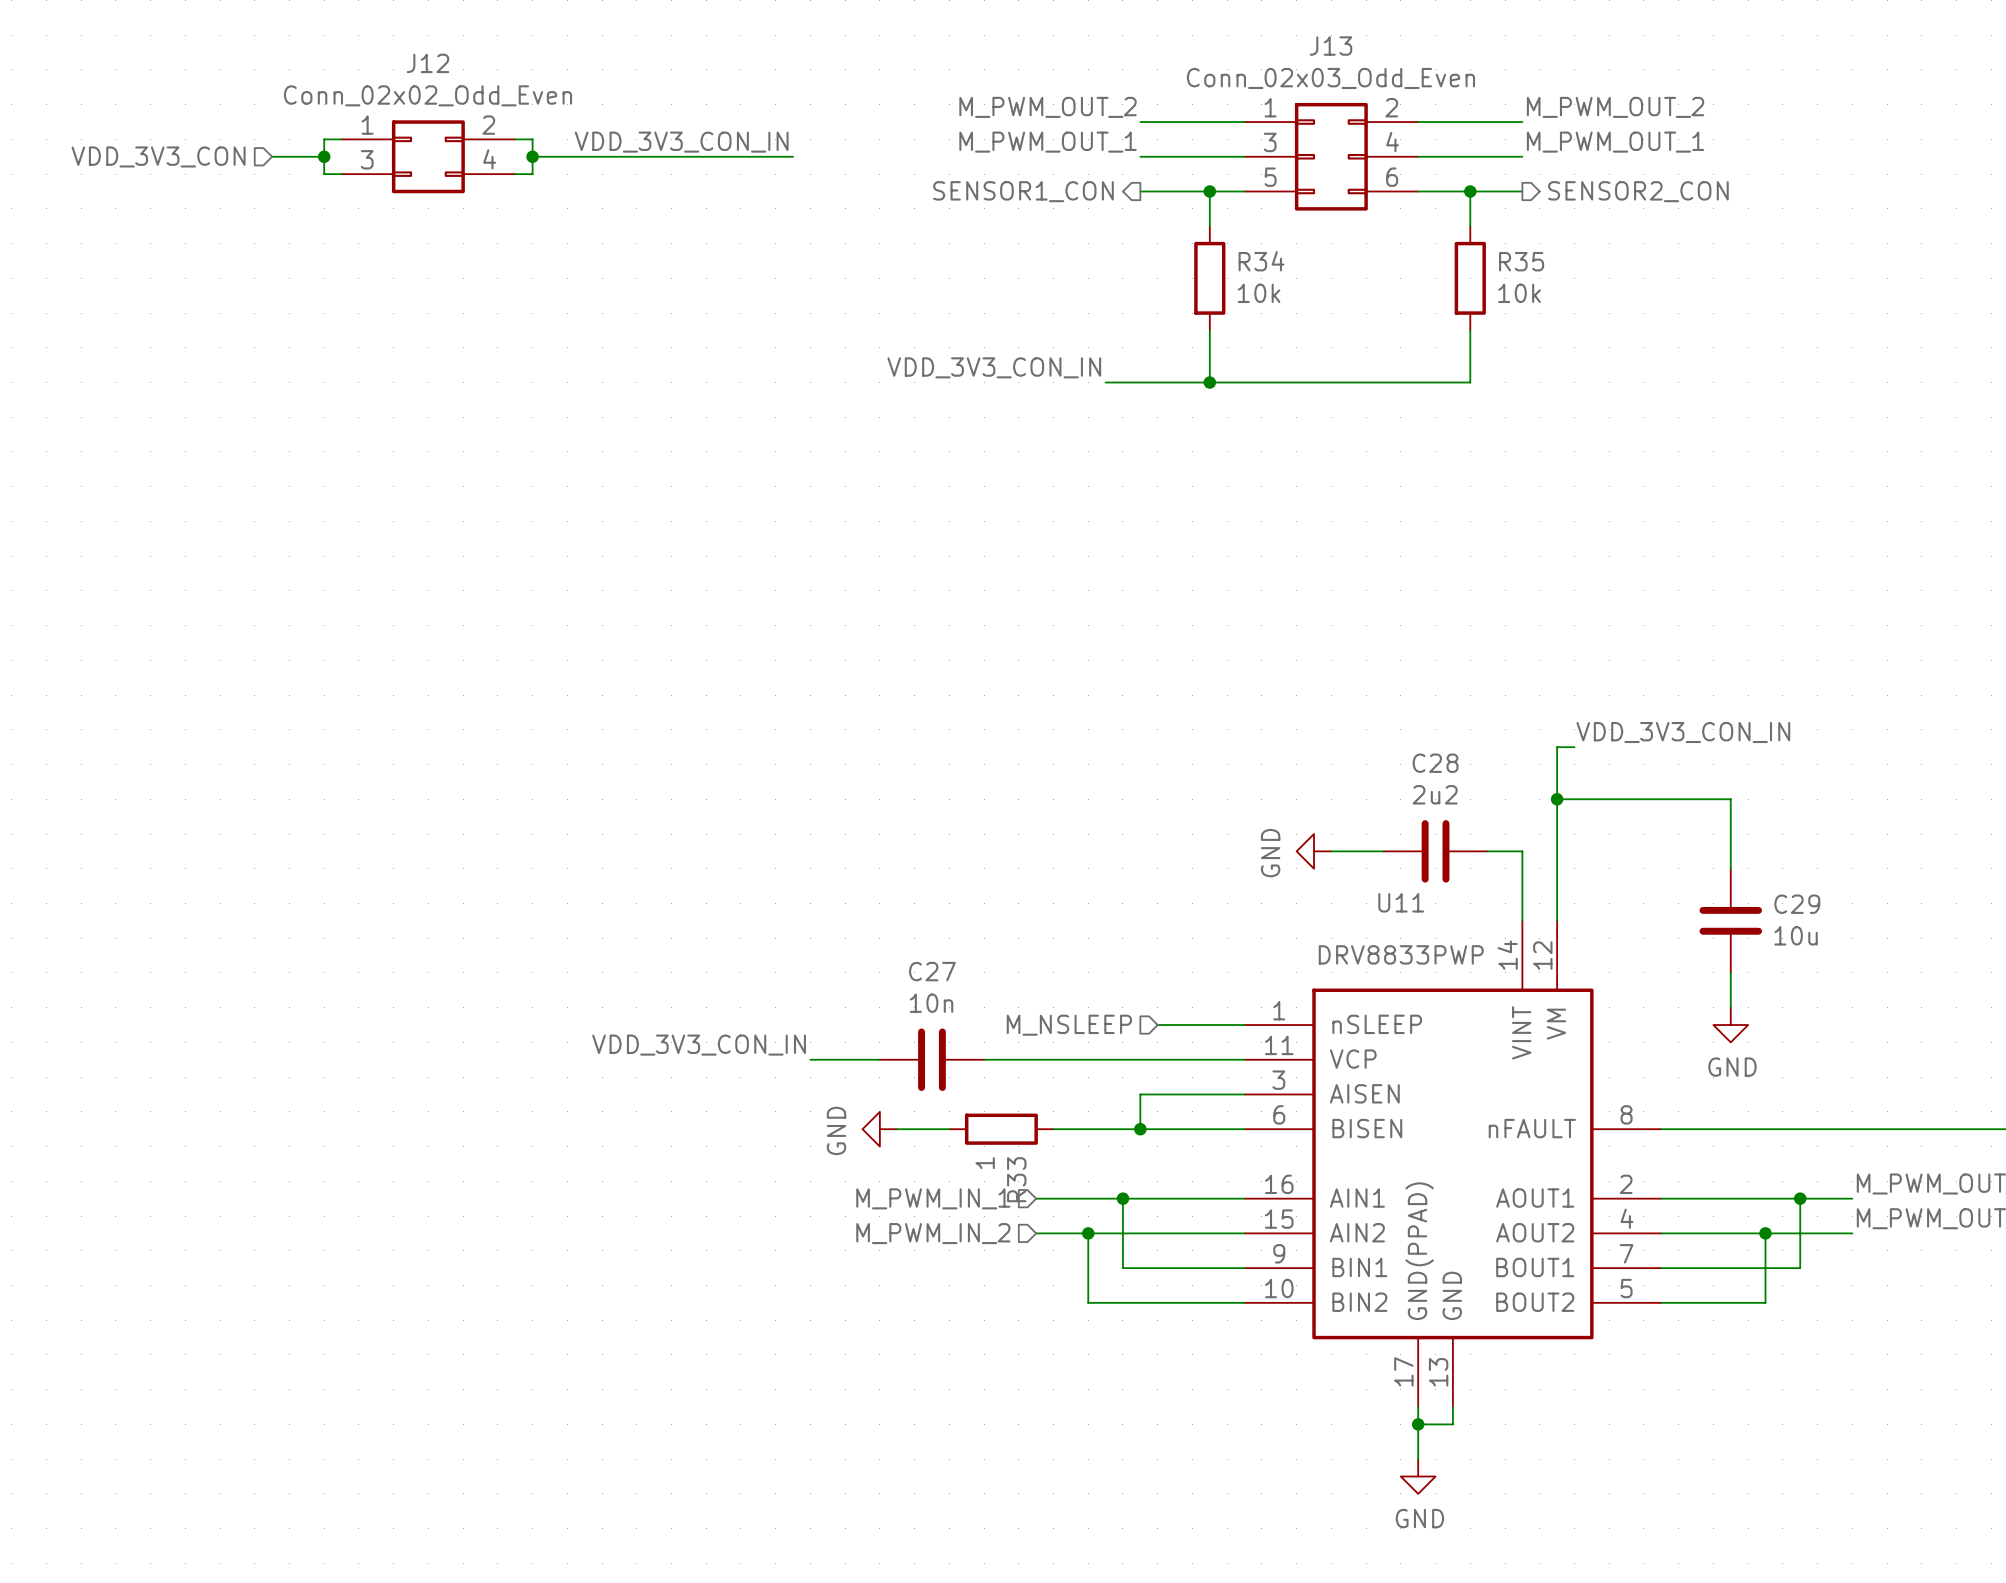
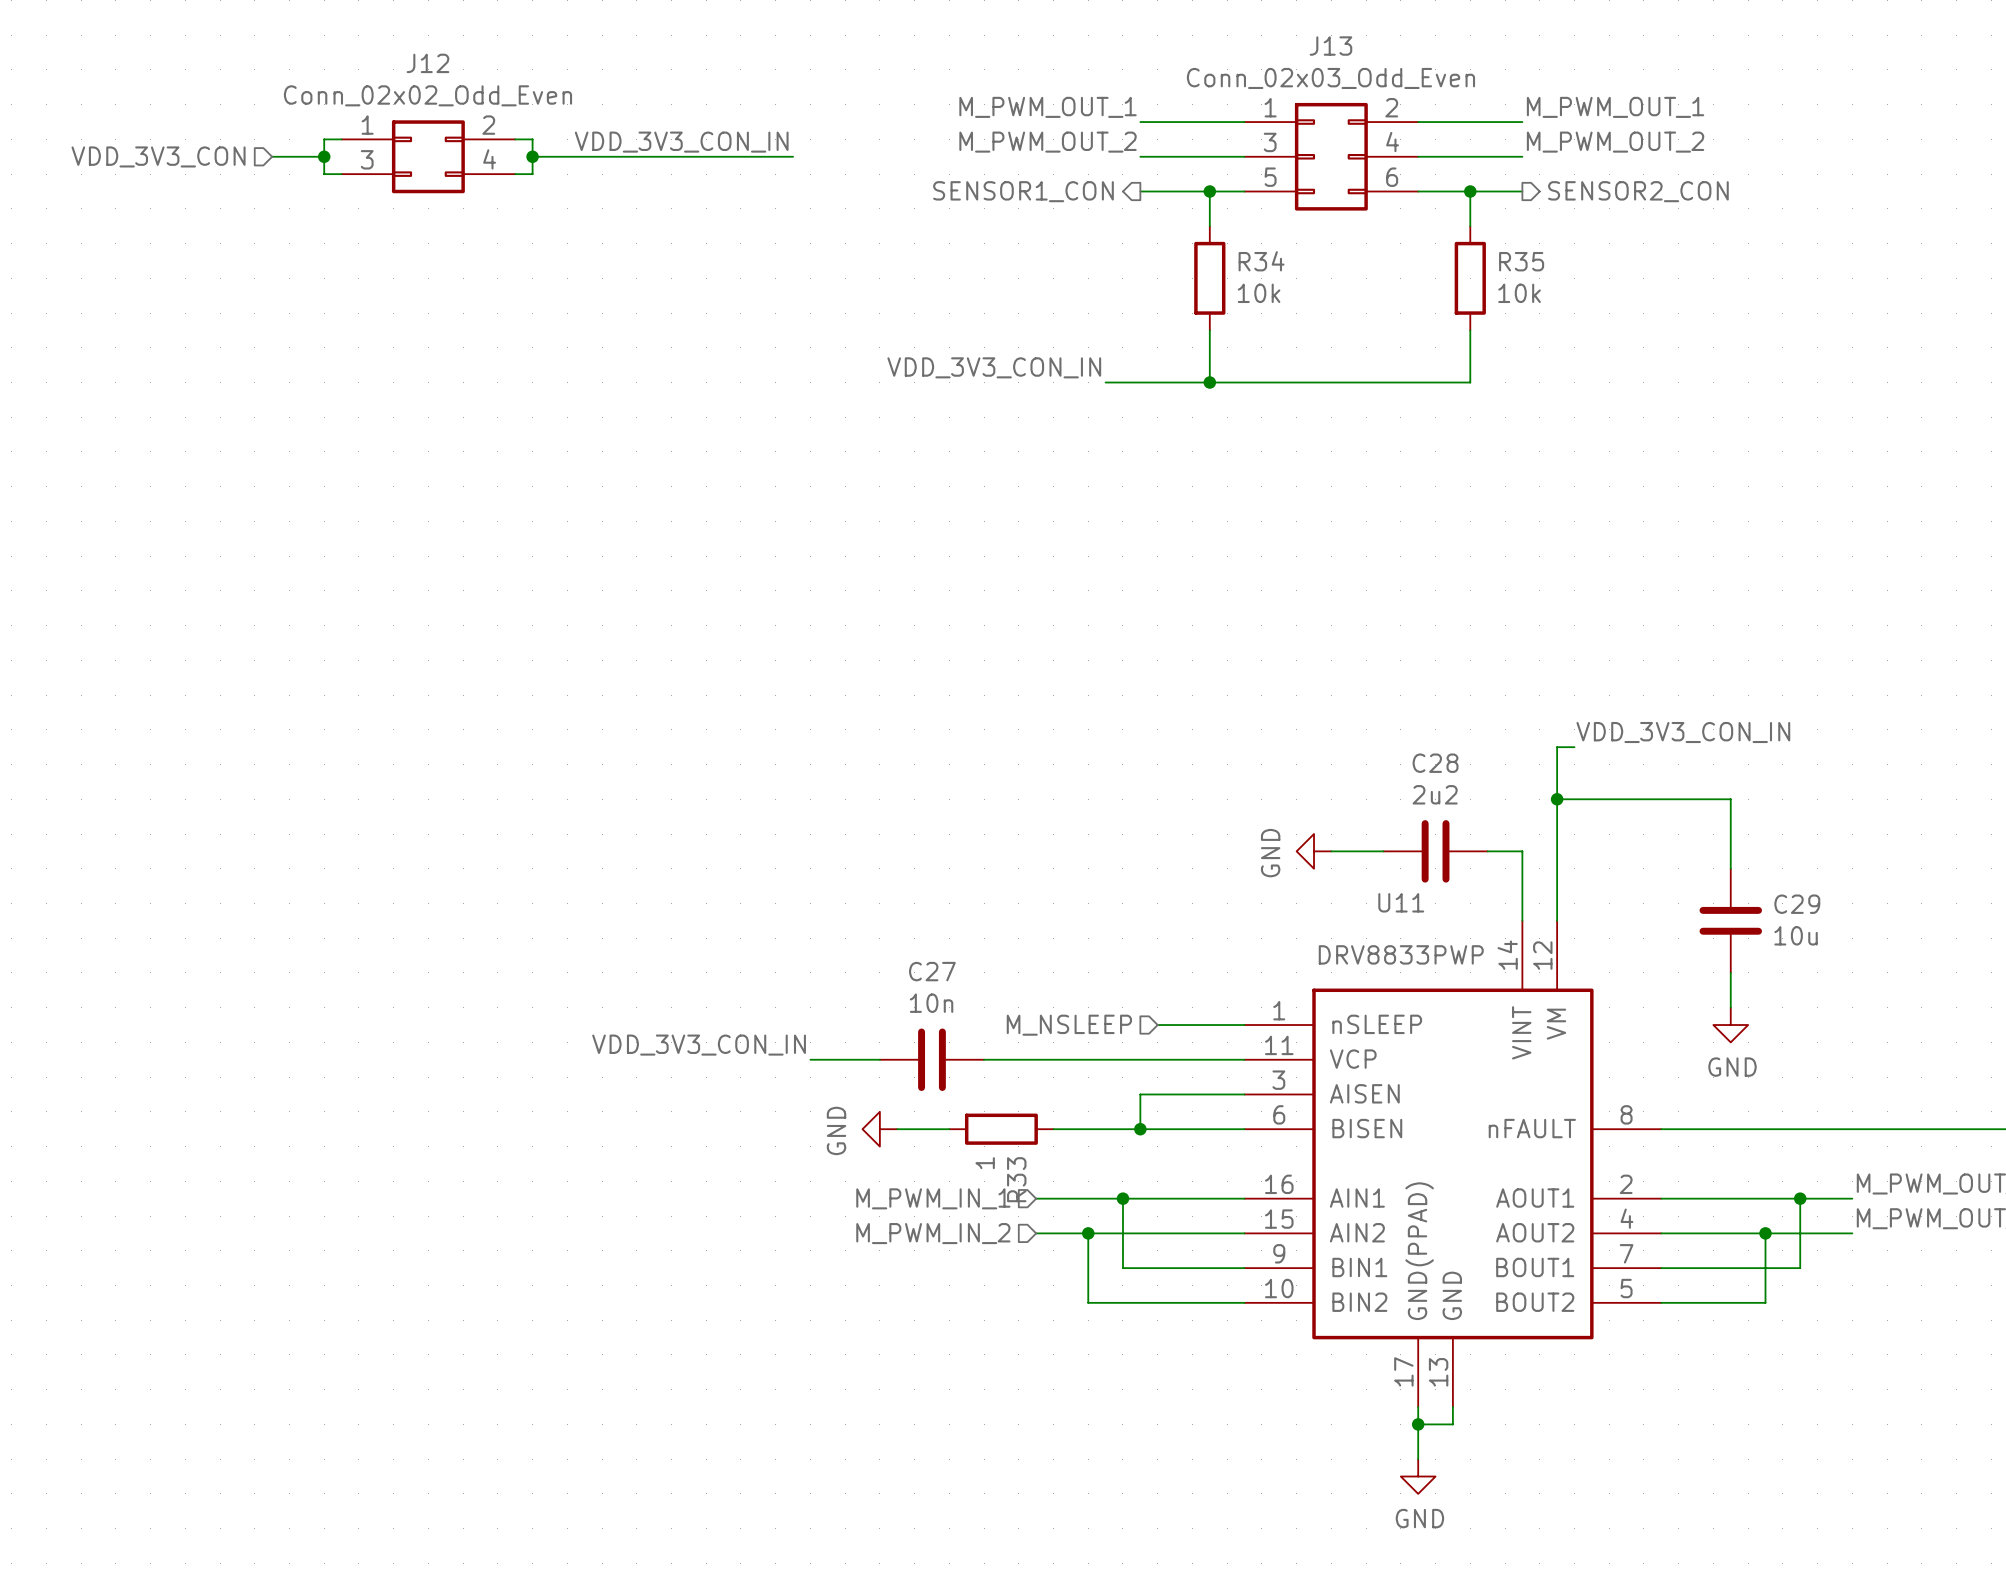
label: M_PWM_OUT_2 (1048, 107) -> M_PWM_OUT_1 (1048, 107)
label: M_PWM_OUT_2 (1615, 107) -> M_PWM_OUT_1 (1615, 107)
label: M_PWM_OUT_1 (1048, 142) -> M_PWM_OUT_2 (1048, 142)
label: M_PWM_OUT_1 (1615, 142) -> M_PWM_OUT_2 (1615, 142)

